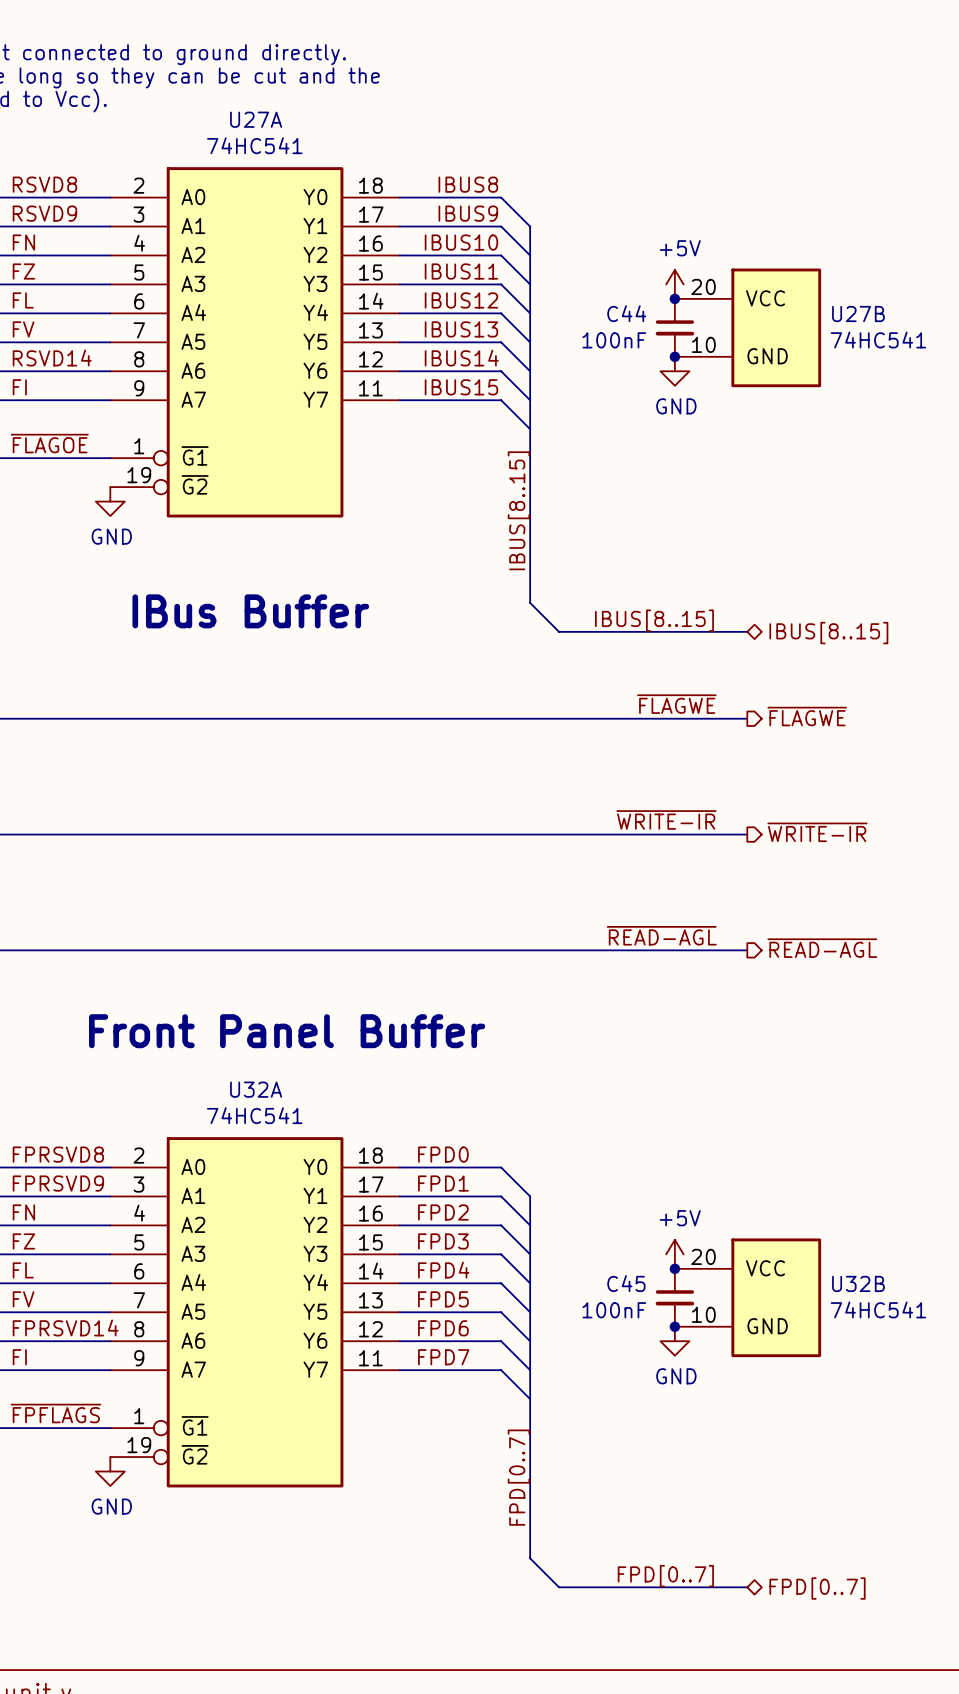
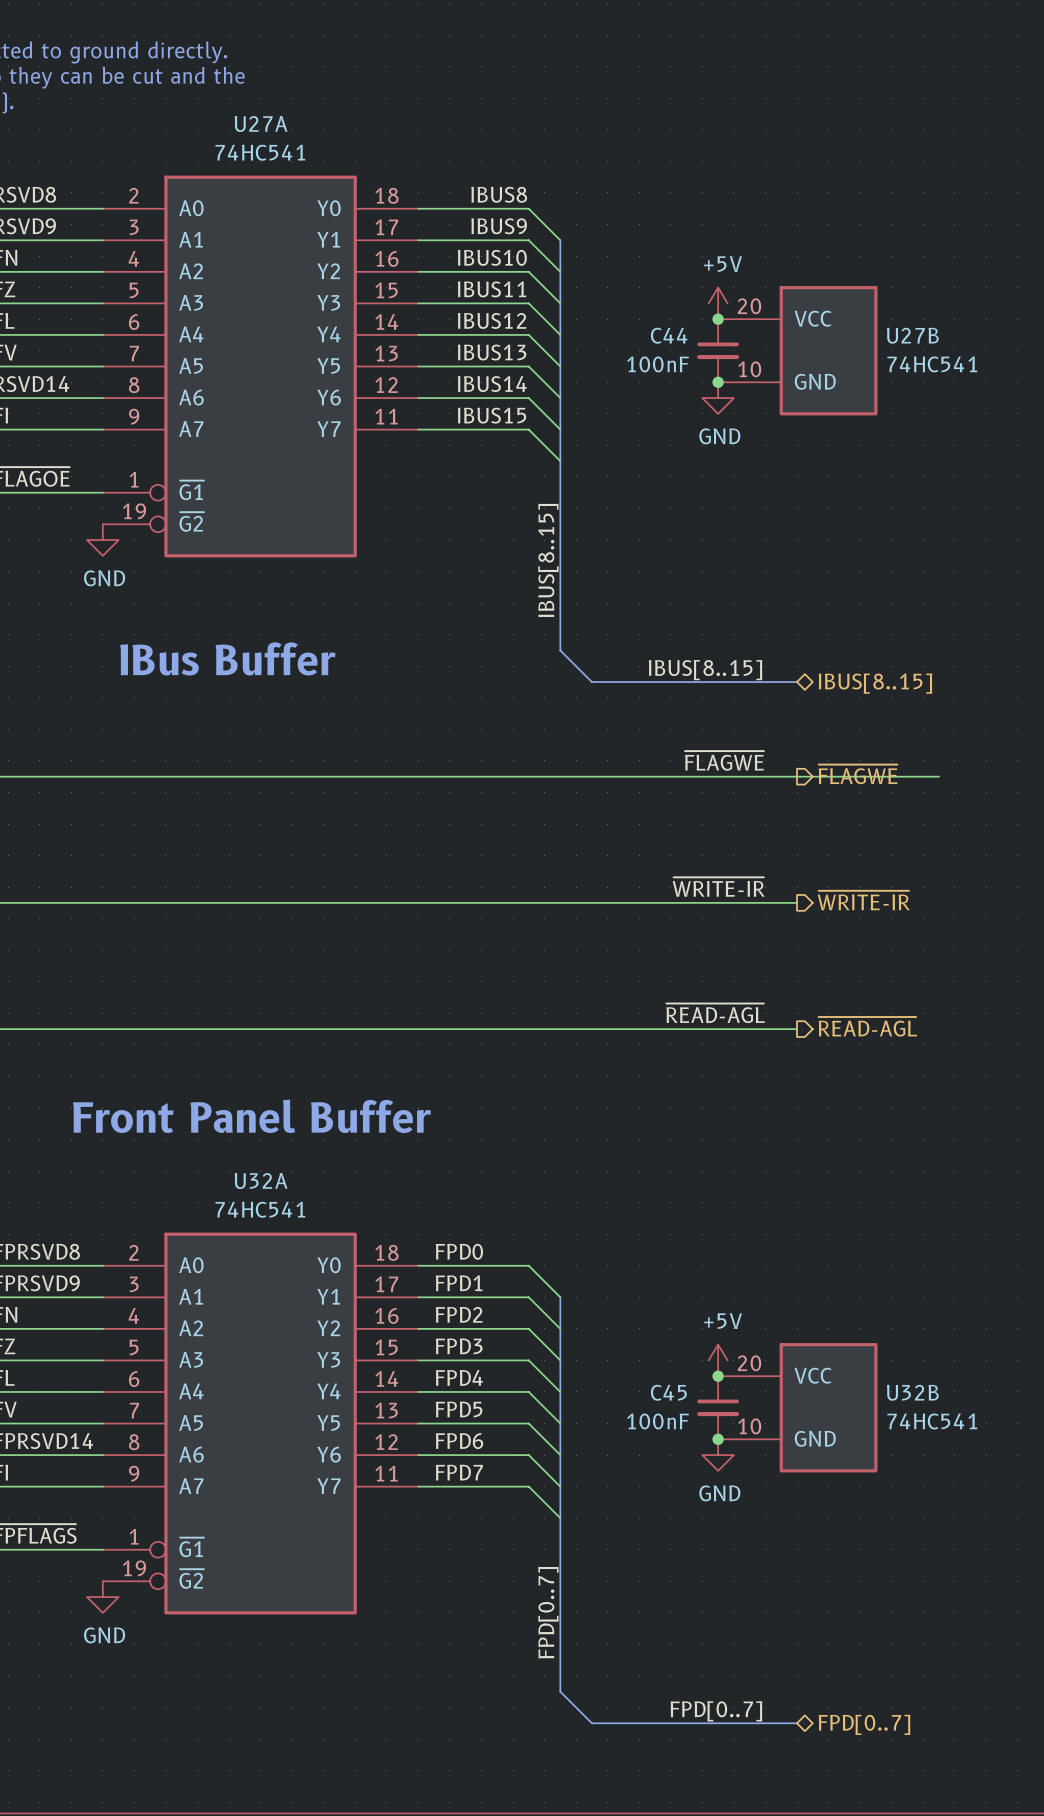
wire: none -> (797, 776) (938, 776)

